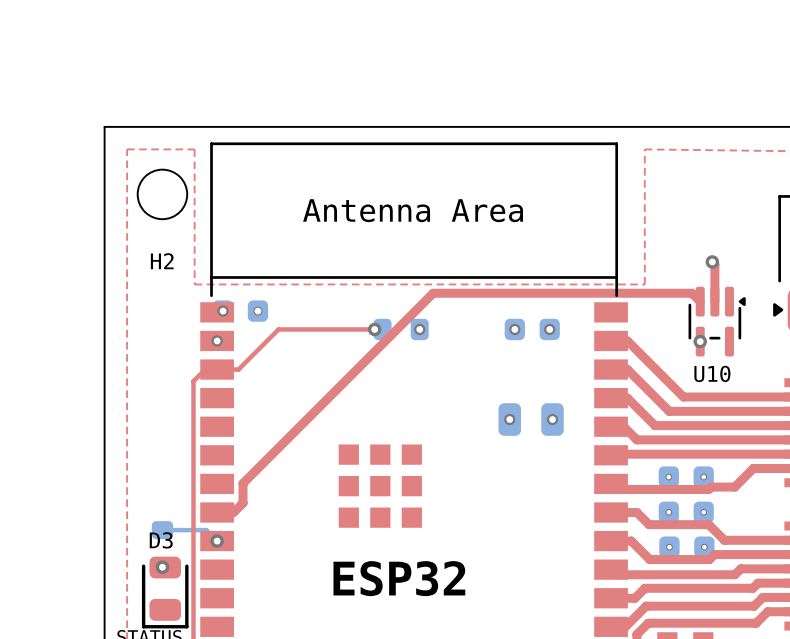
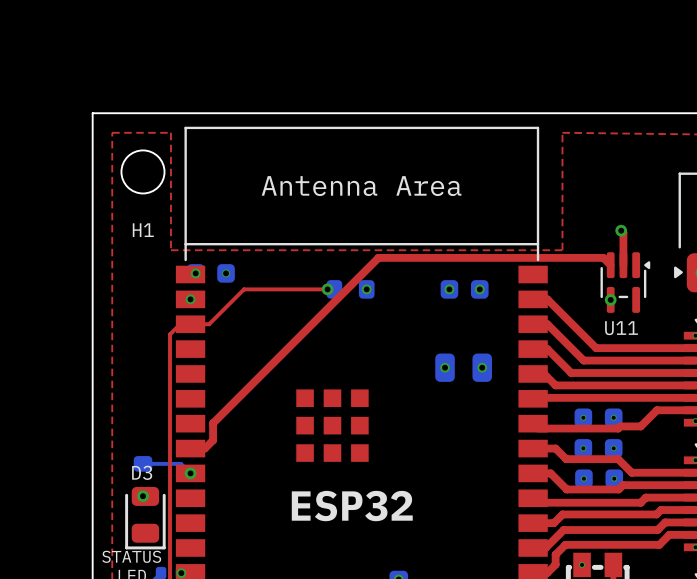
H2 name: H2 (162, 261) -> H1 (143, 230)
U10 name: U10 (712, 373) -> U11 (621, 328)

